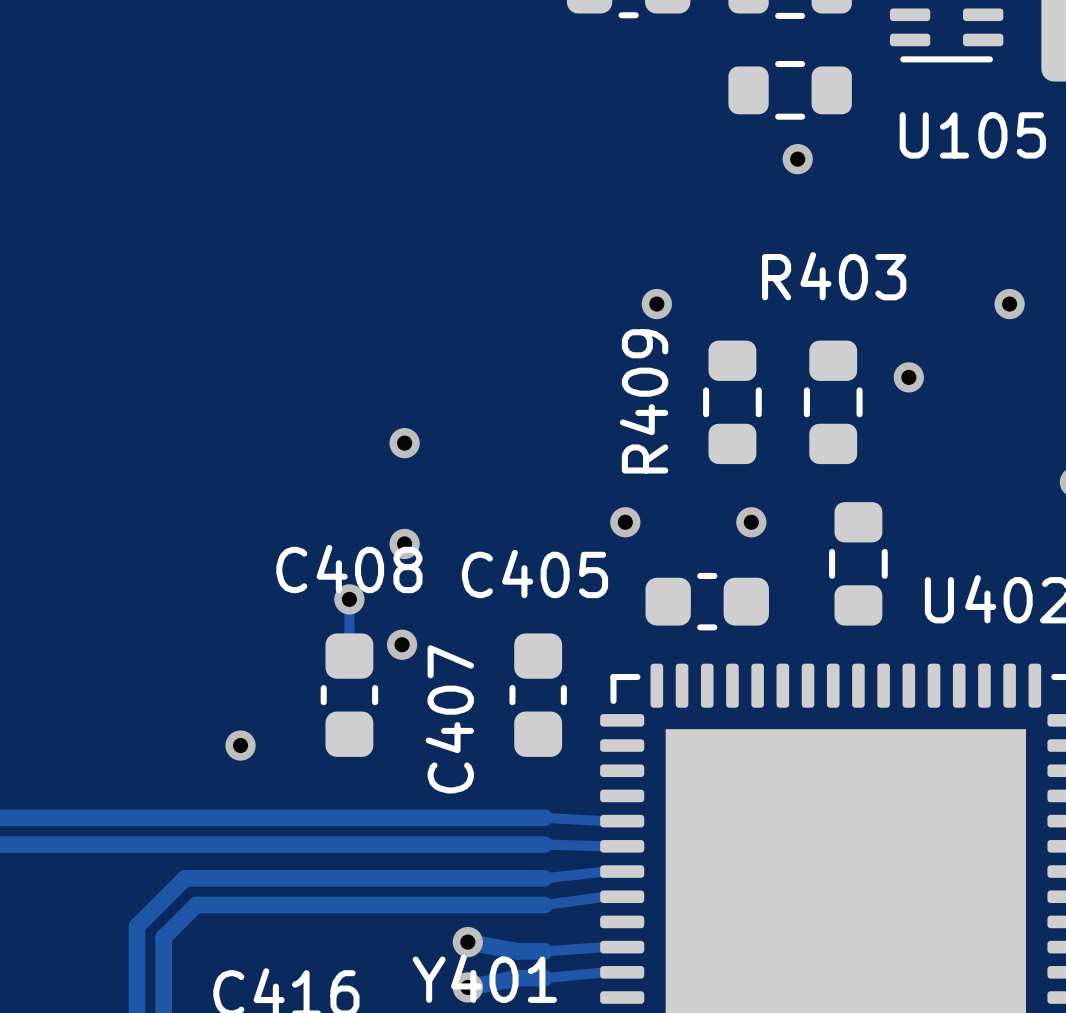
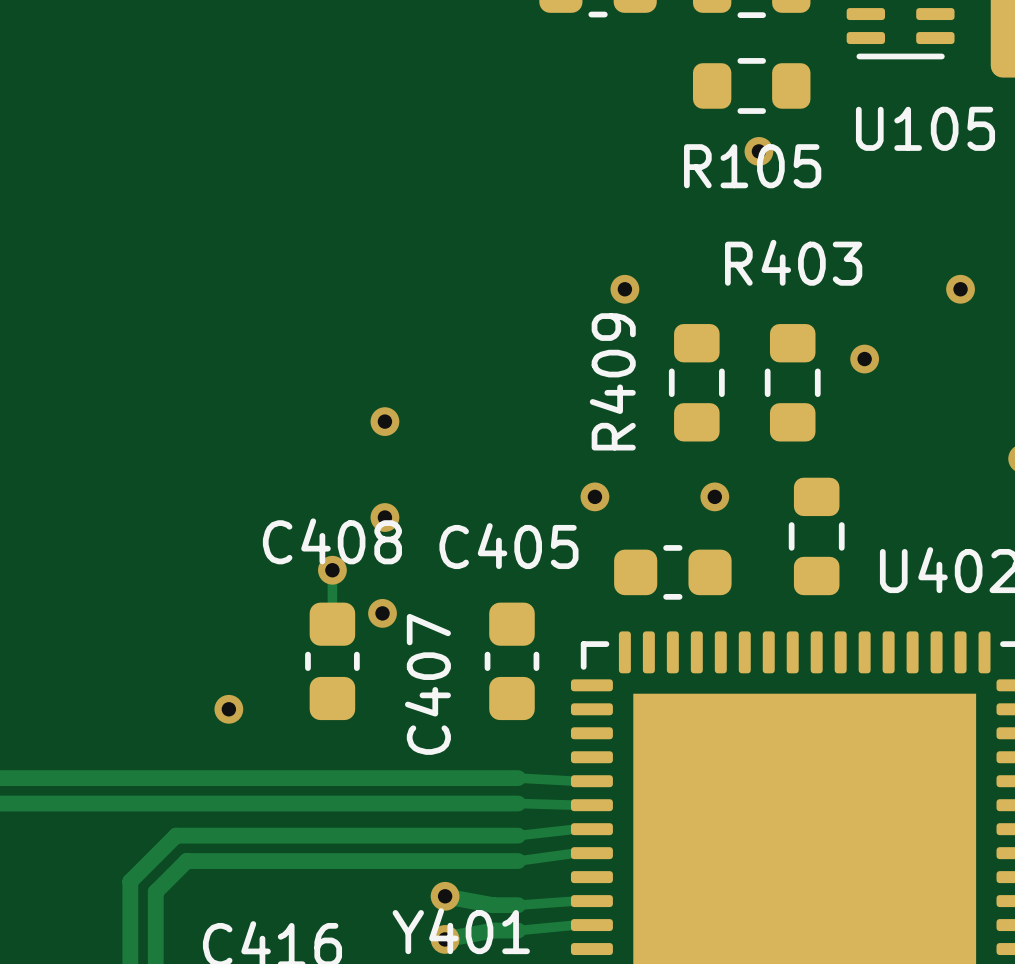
R105 name: none -> R105 (752, 166)

